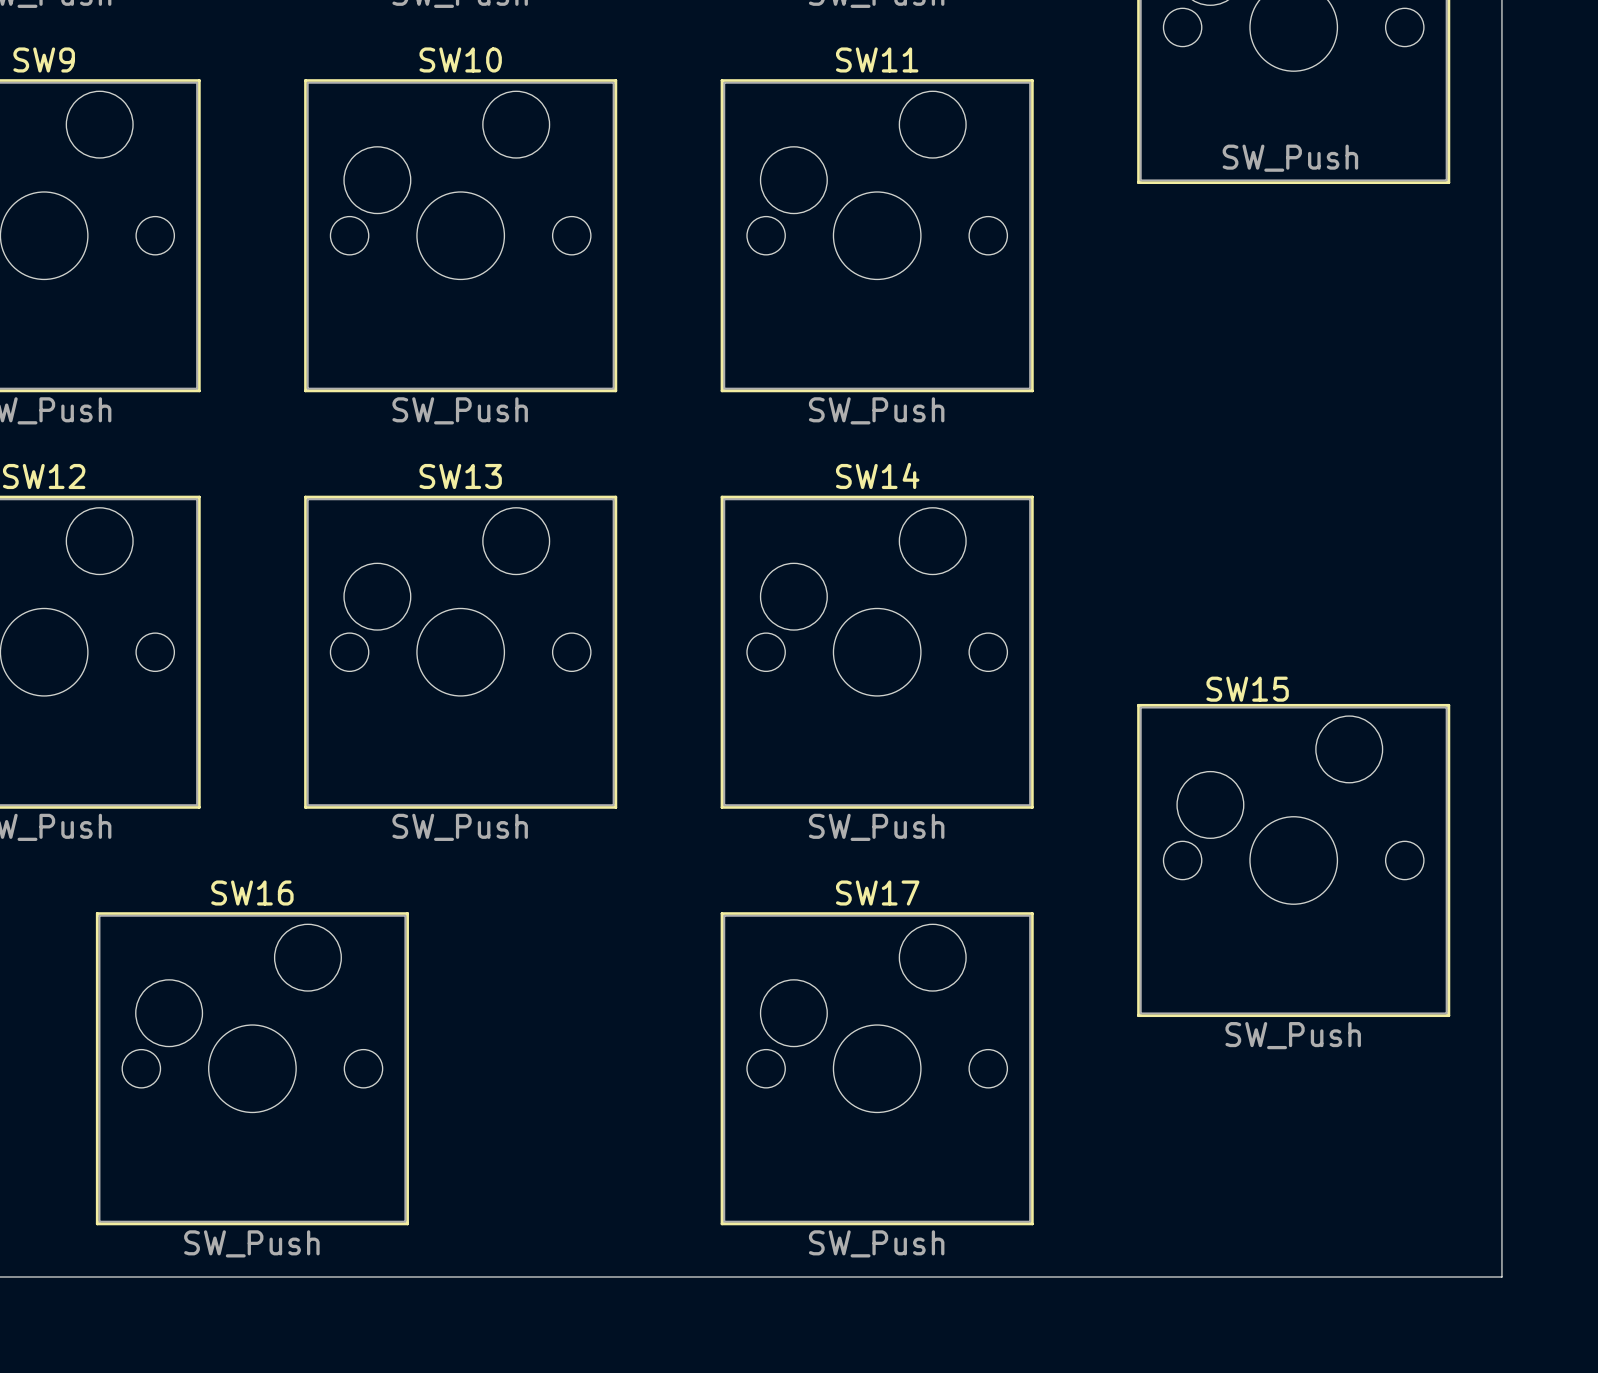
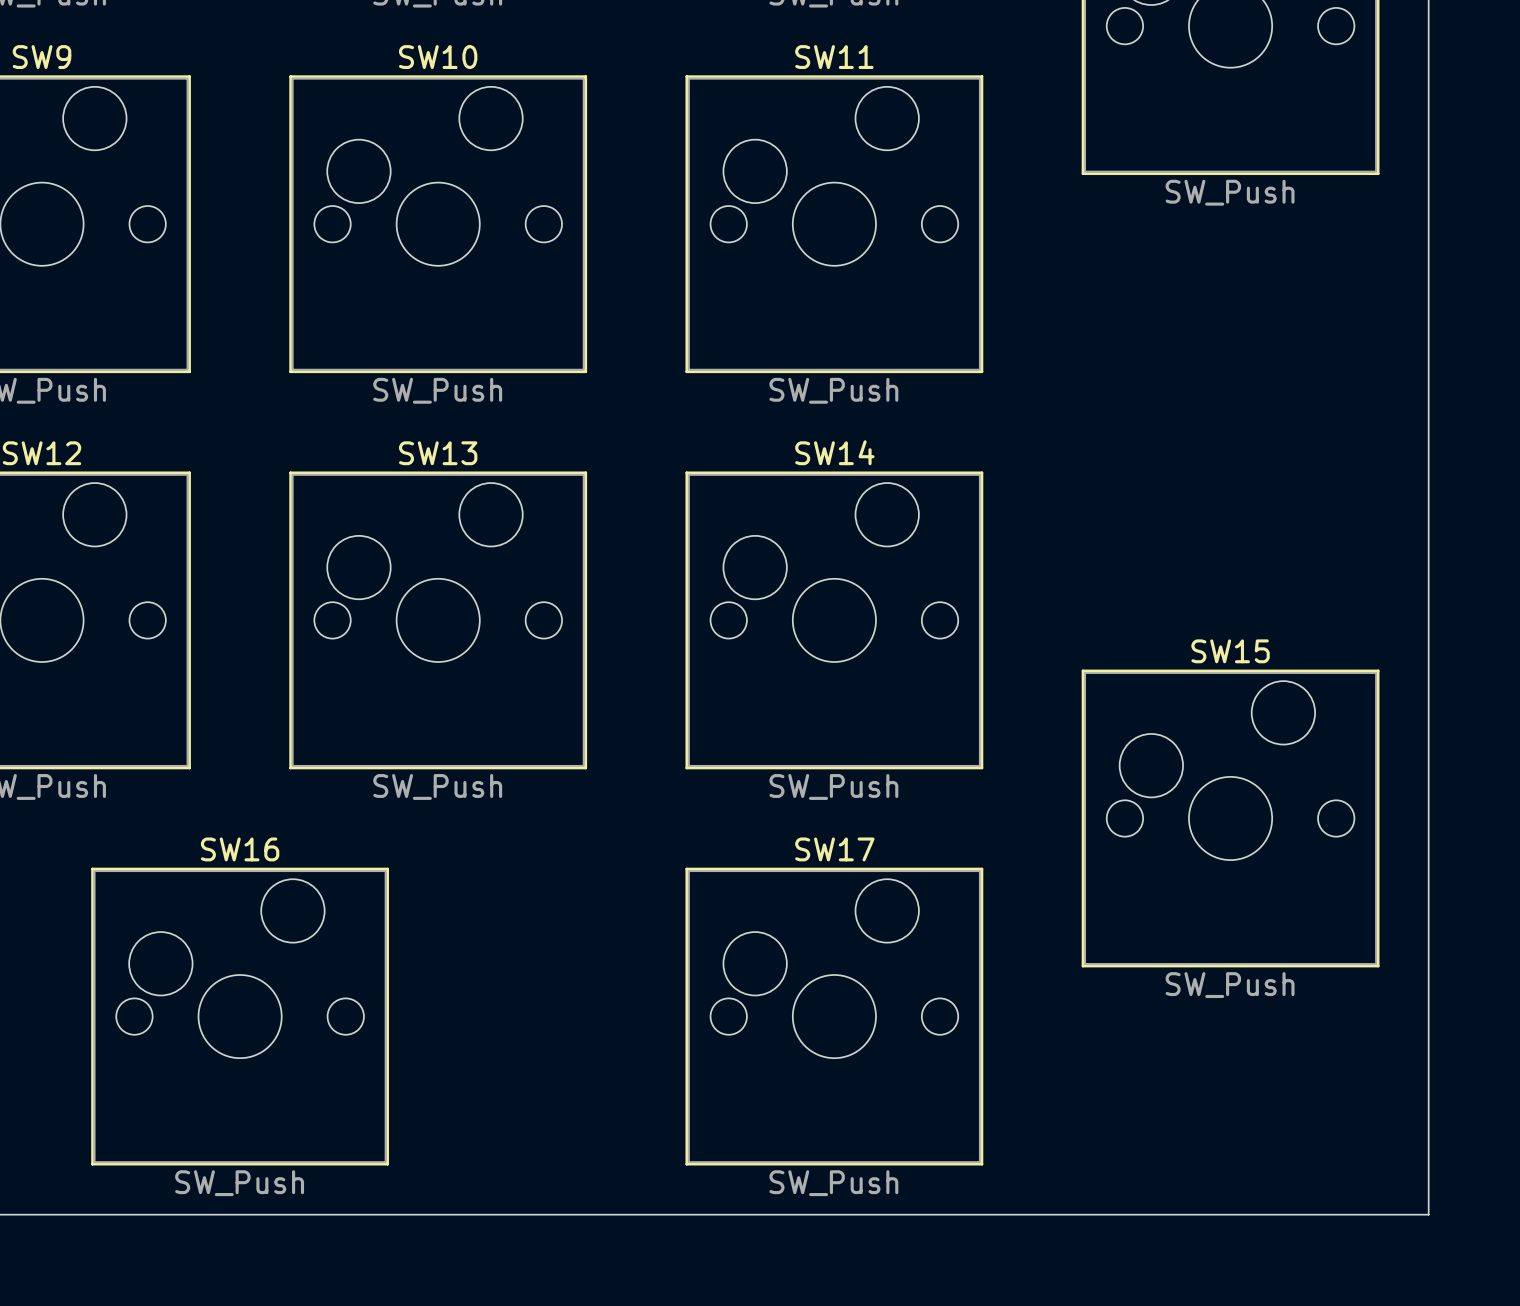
part value position: SW_Push (1290, 158) -> SW_Push (1230, 192)
SW15 name position: SW15 (1247, 689) -> SW15 (1230, 651)

